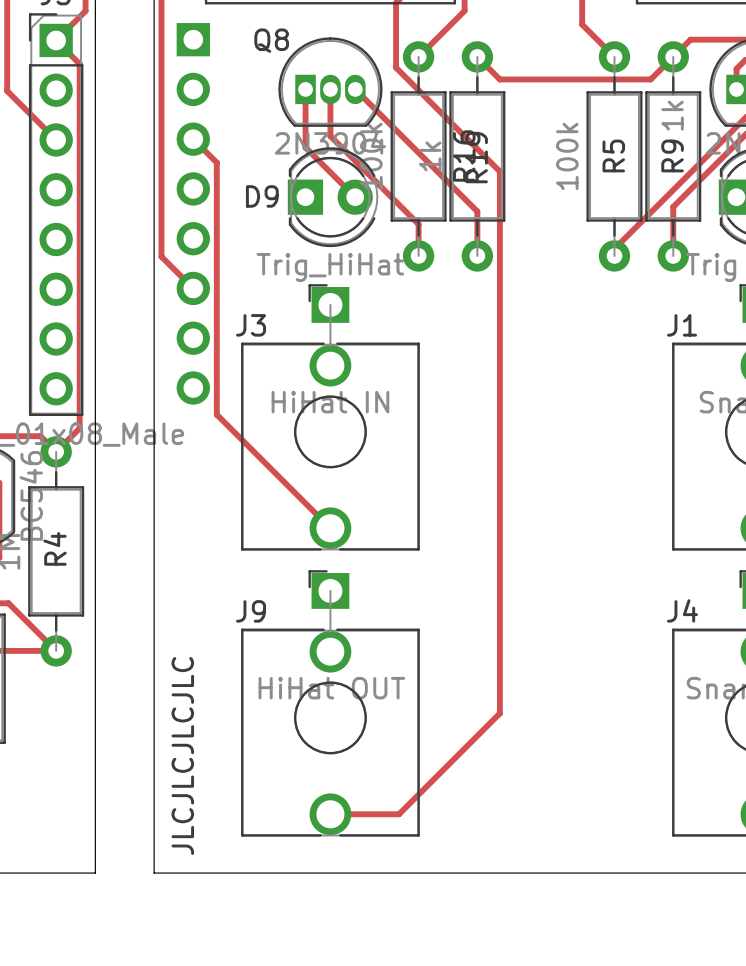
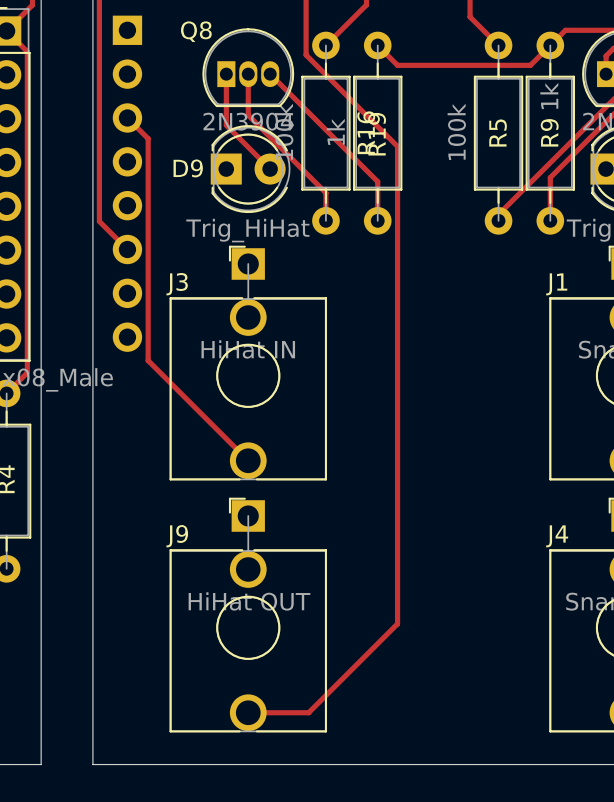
text: JLCJLCJLCJLC (182, 755) -> none

